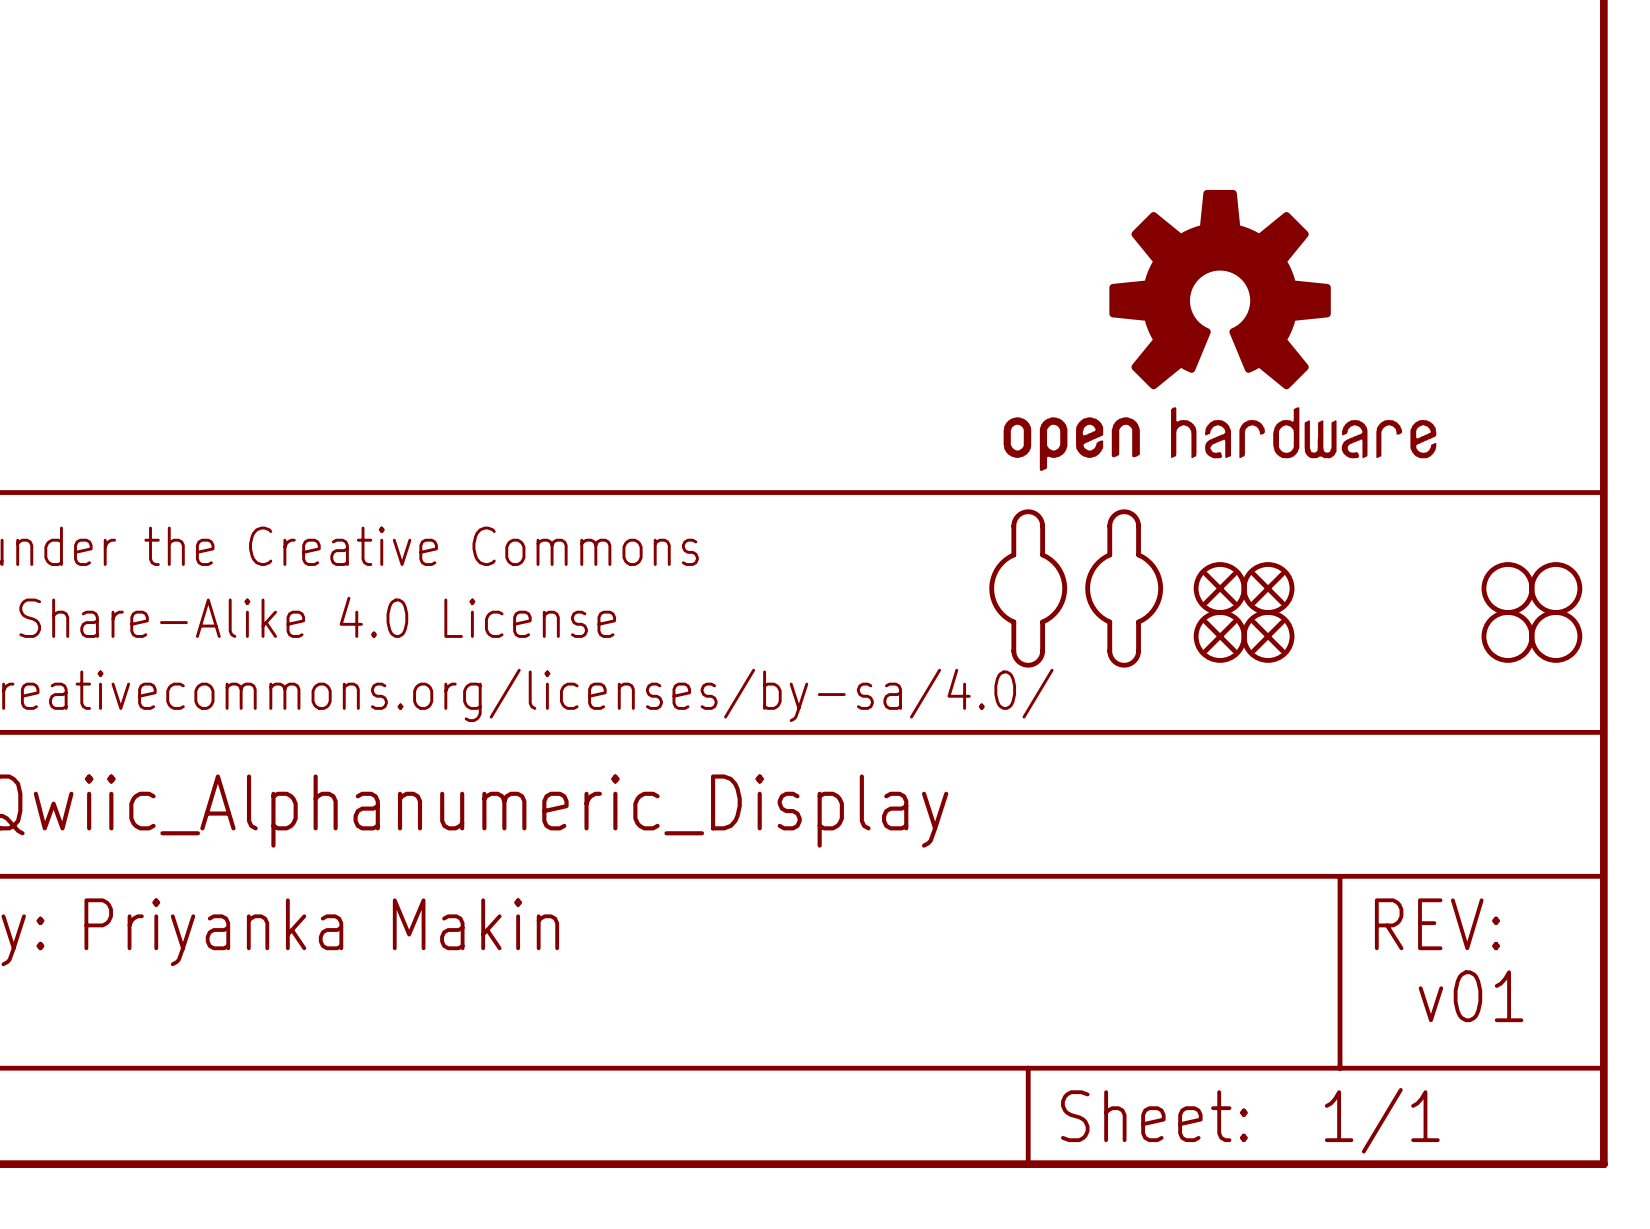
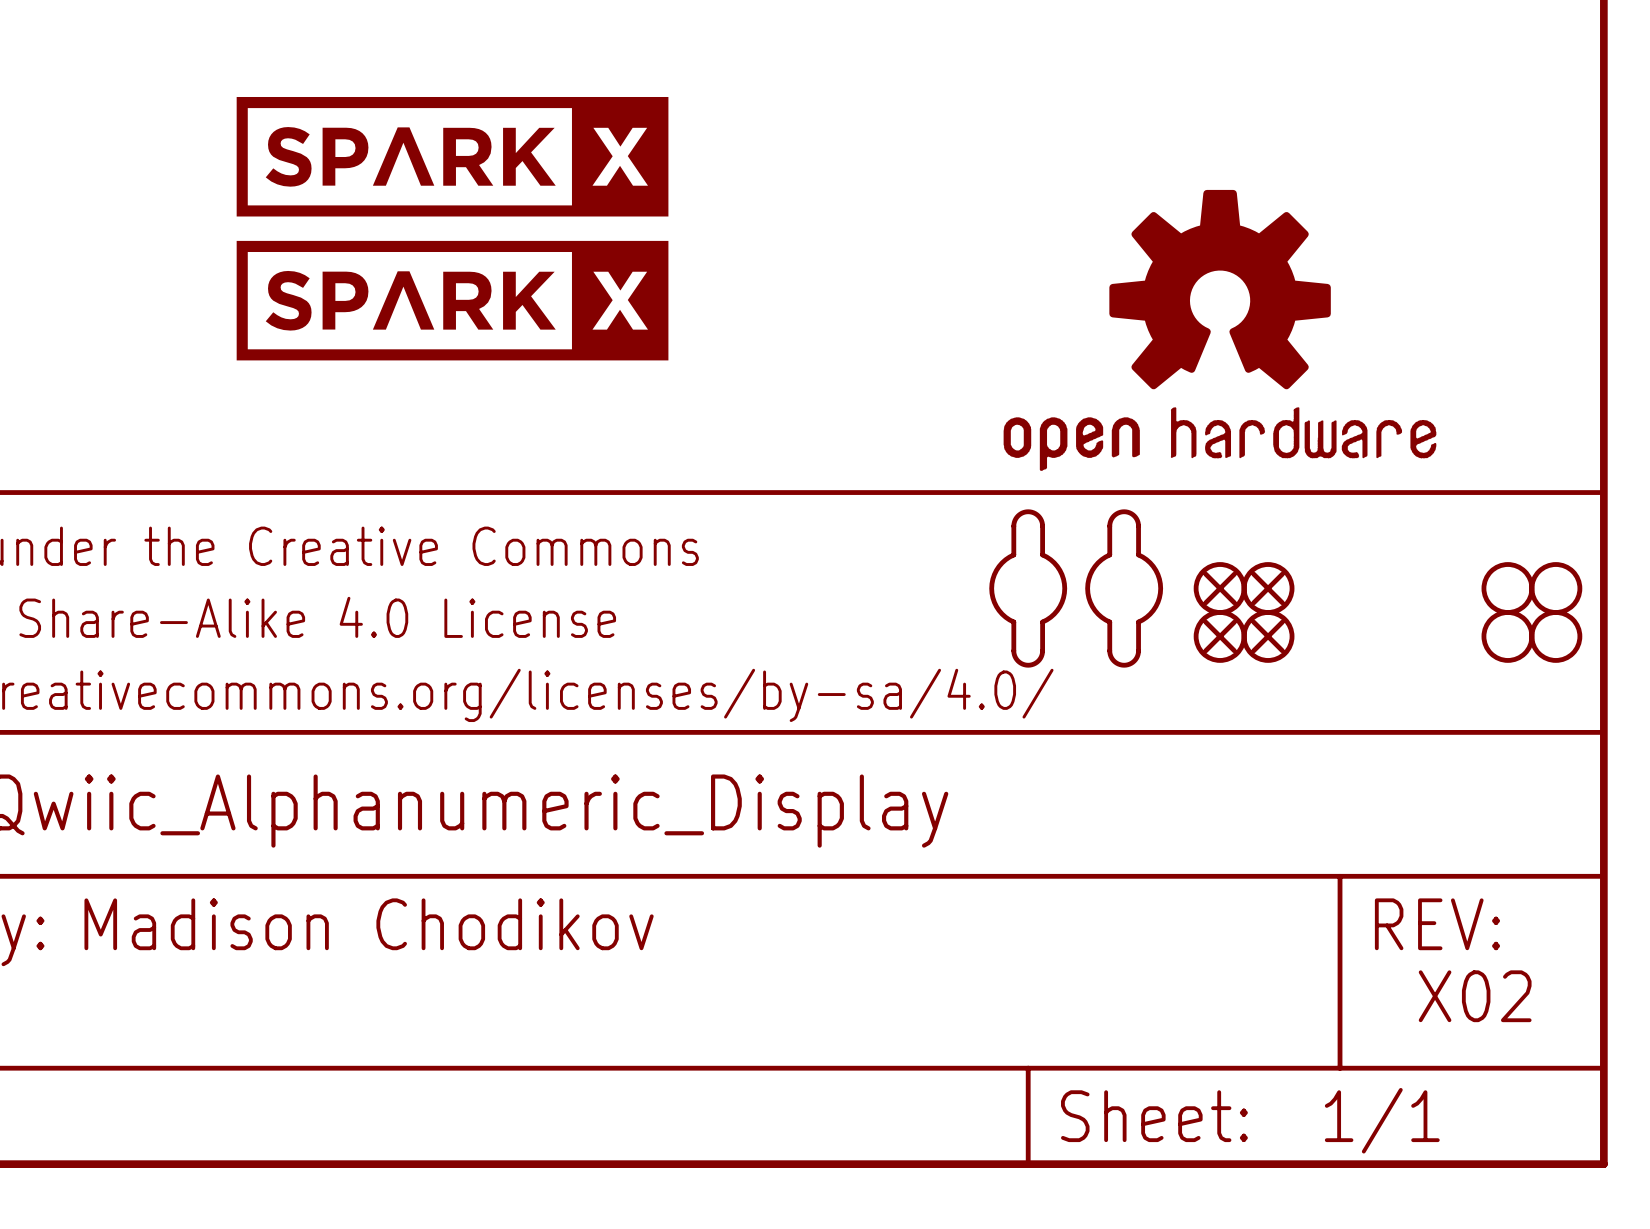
part: none -> (452, 156)
part: none -> (452, 300)
text: Priyanka Makin (321, 932) -> Madison Chodikov (369, 924)
text: v01 (1471, 996) -> X02 (1475, 996)

